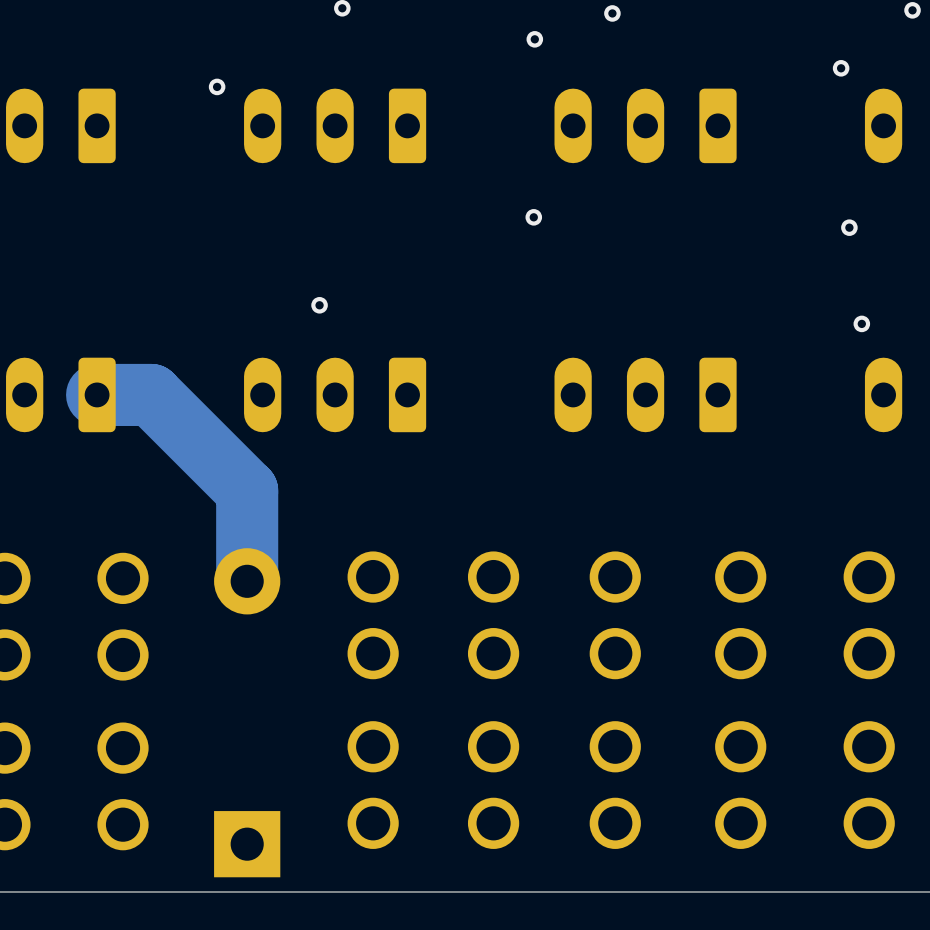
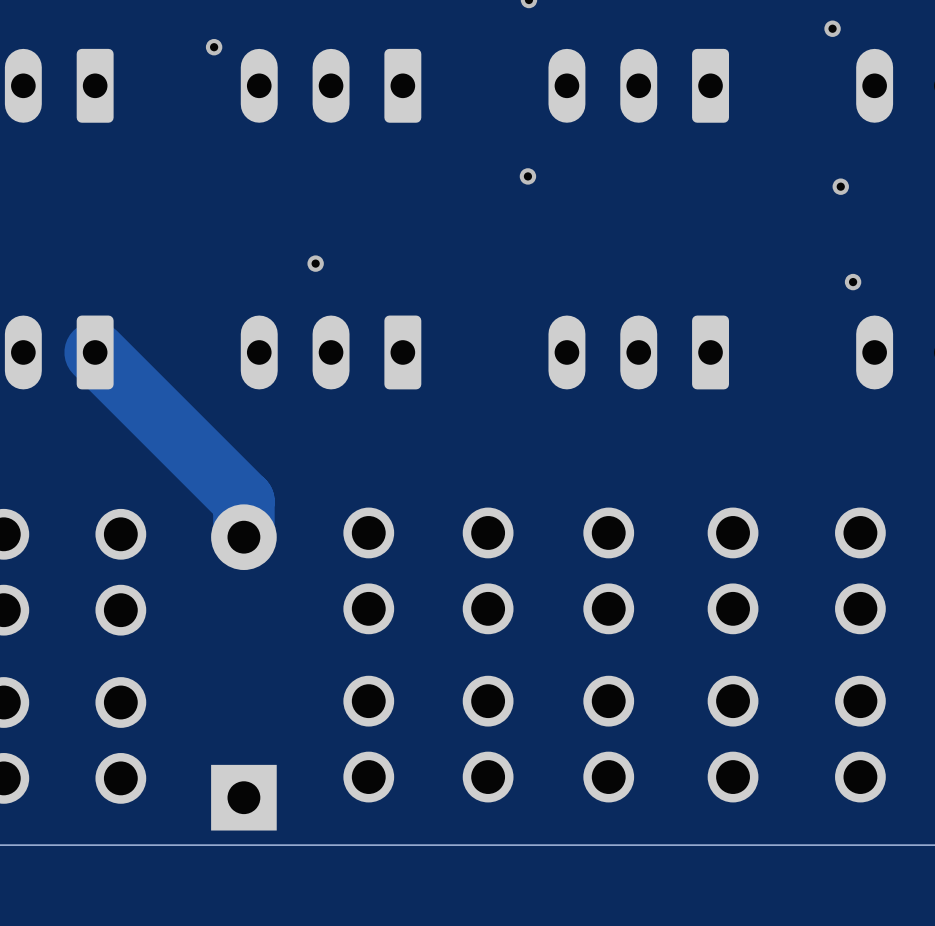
track: (97, 394) (151, 394) (247, 490) (247, 545) -> (95, 352) (243, 501)

